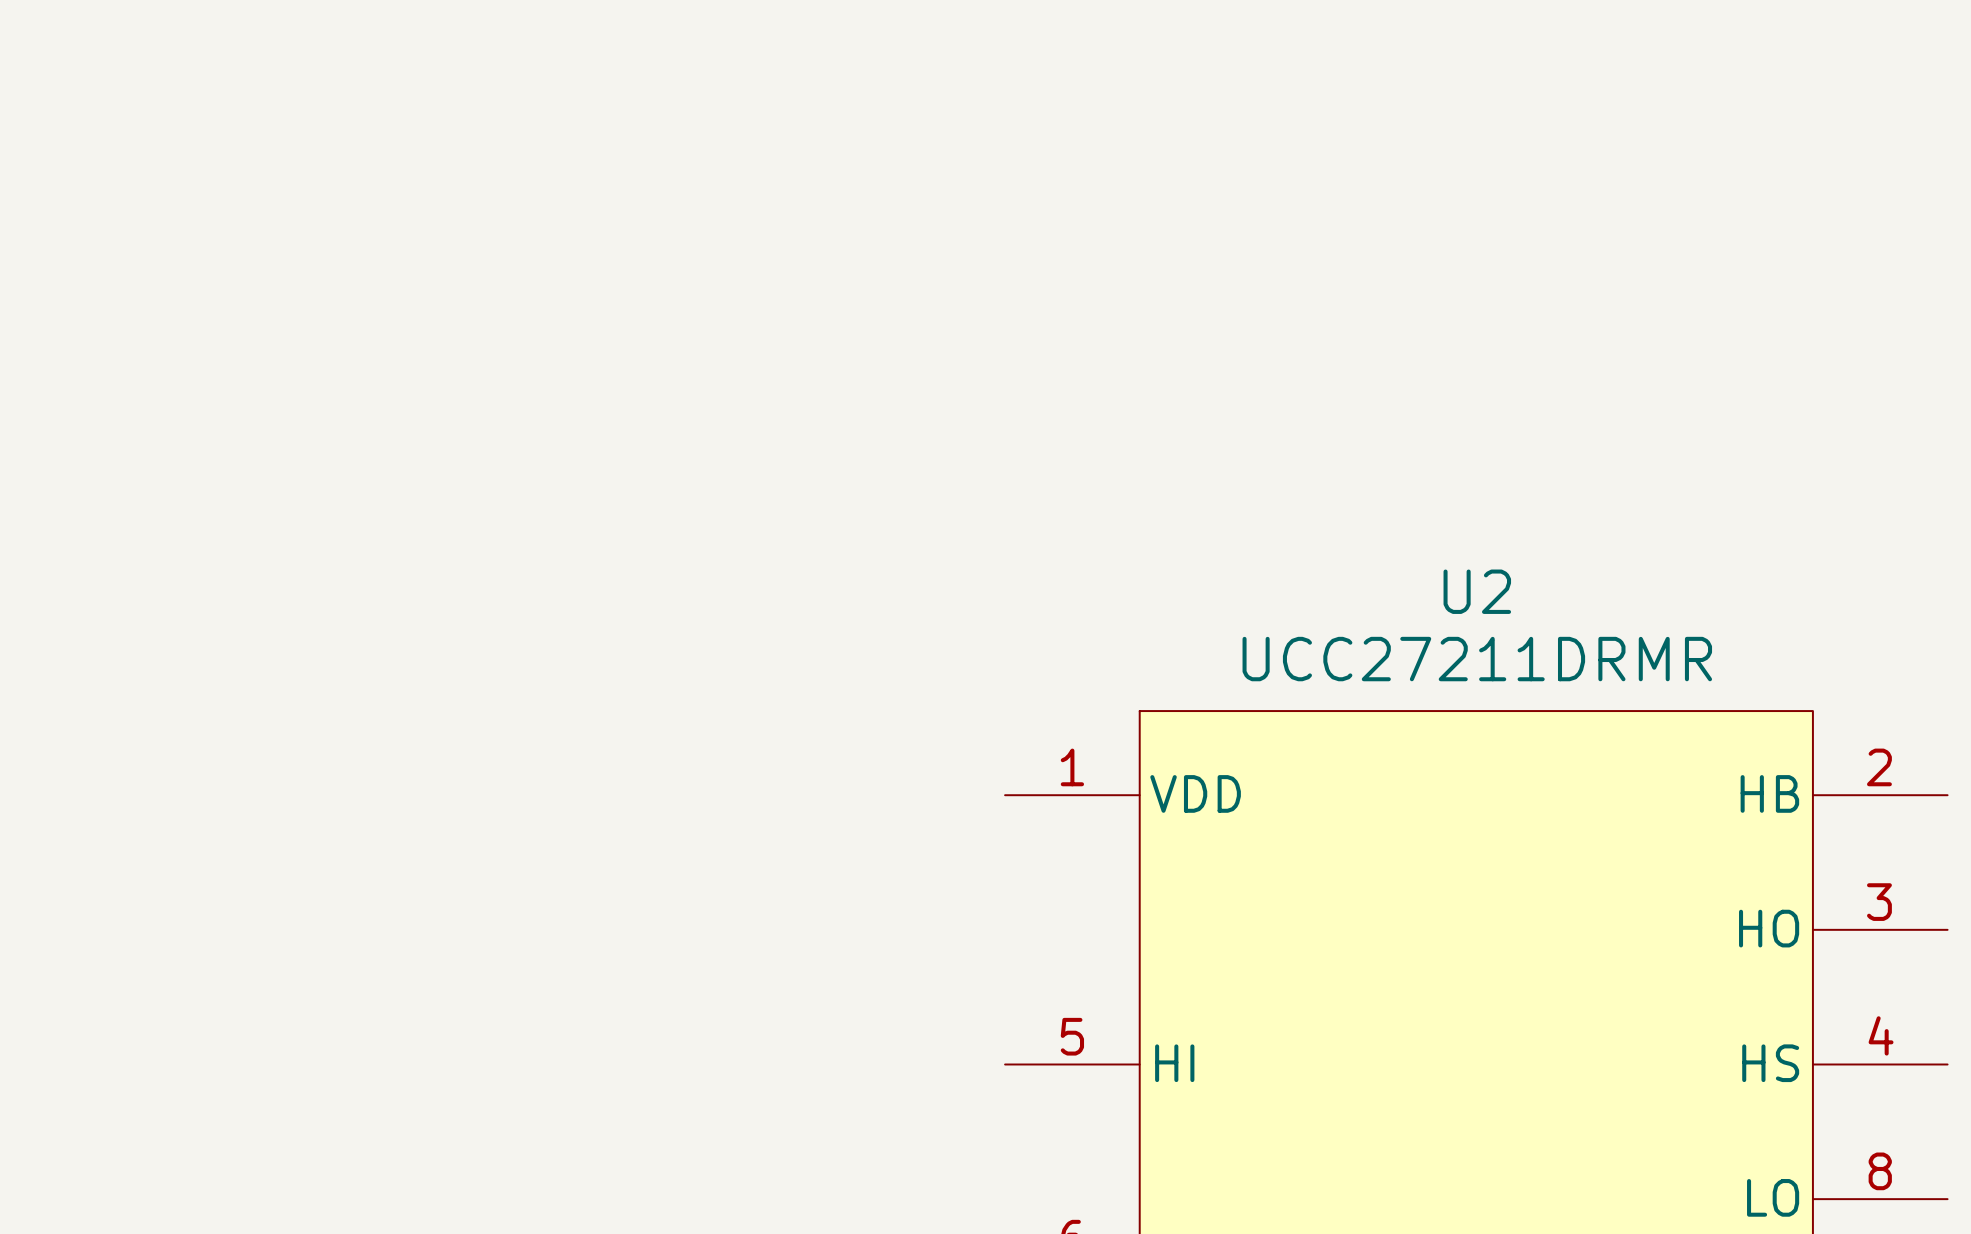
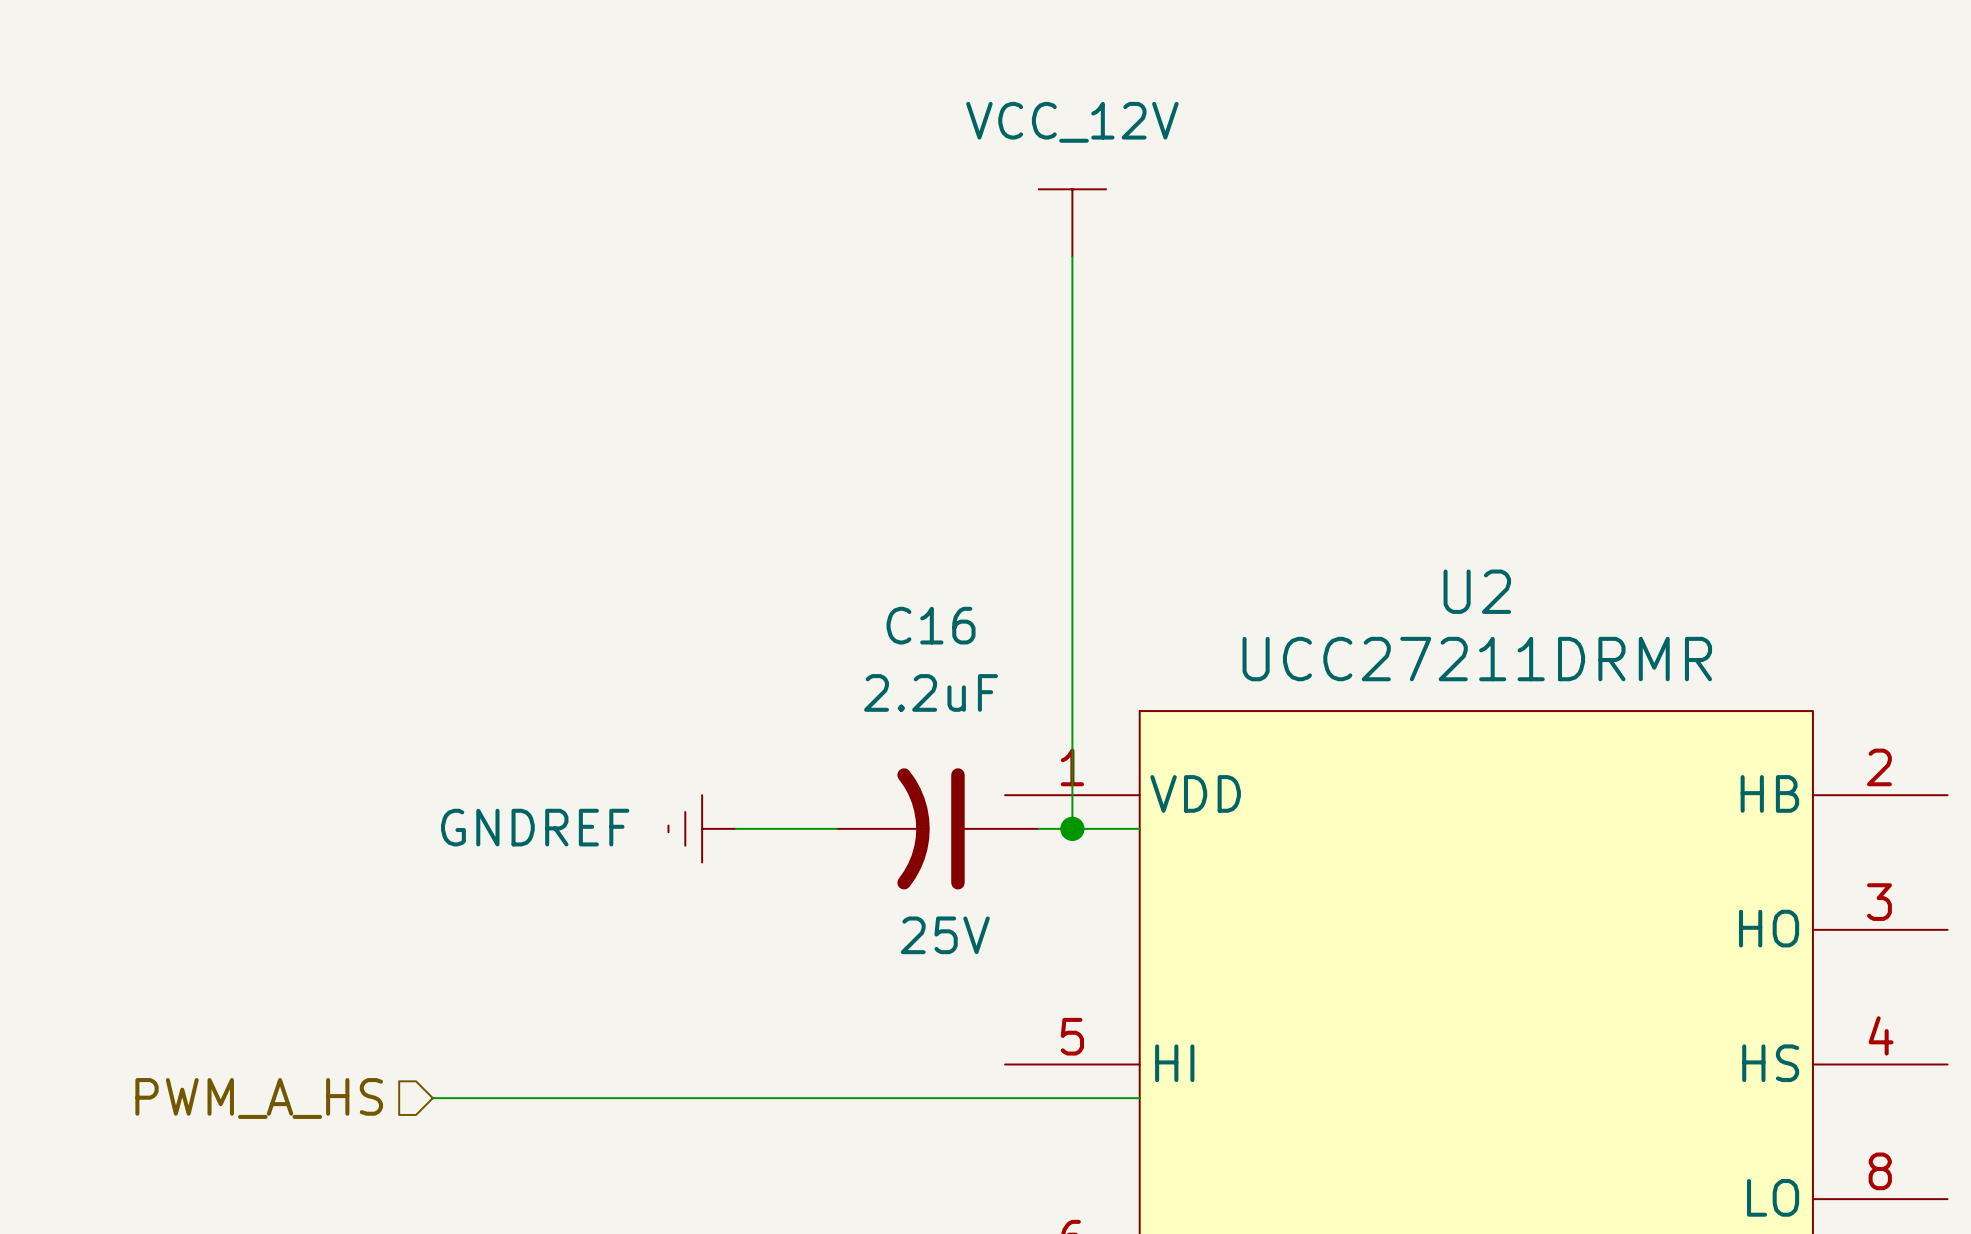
power symbol: none -> VCC_12V (1072, 222)
wire: none -> (1072, 256) (1072, 828)
power symbol: none -> GNDREF (702, 828)
wire: none -> (735, 828) (836, 828)
C16: none -> 2.2uF (937, 828)
wire: none -> (1038, 828) (1139, 828)
junction: none -> (1072, 828)
hierarchical label: none -> PWM_A_HS (259, 1098)
wire: none -> (432, 1098) (1139, 1098)

